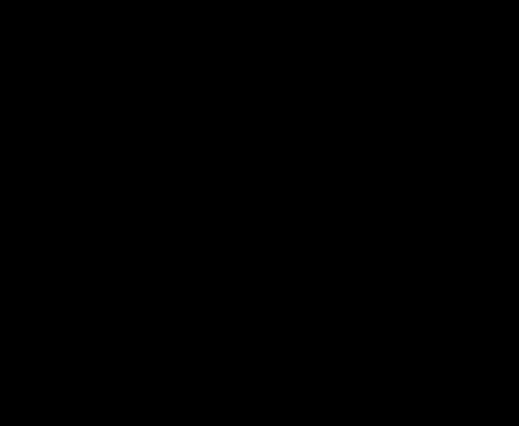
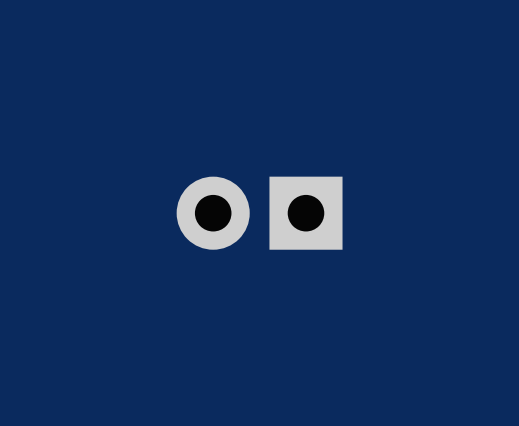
part: none -> (259, 213)

